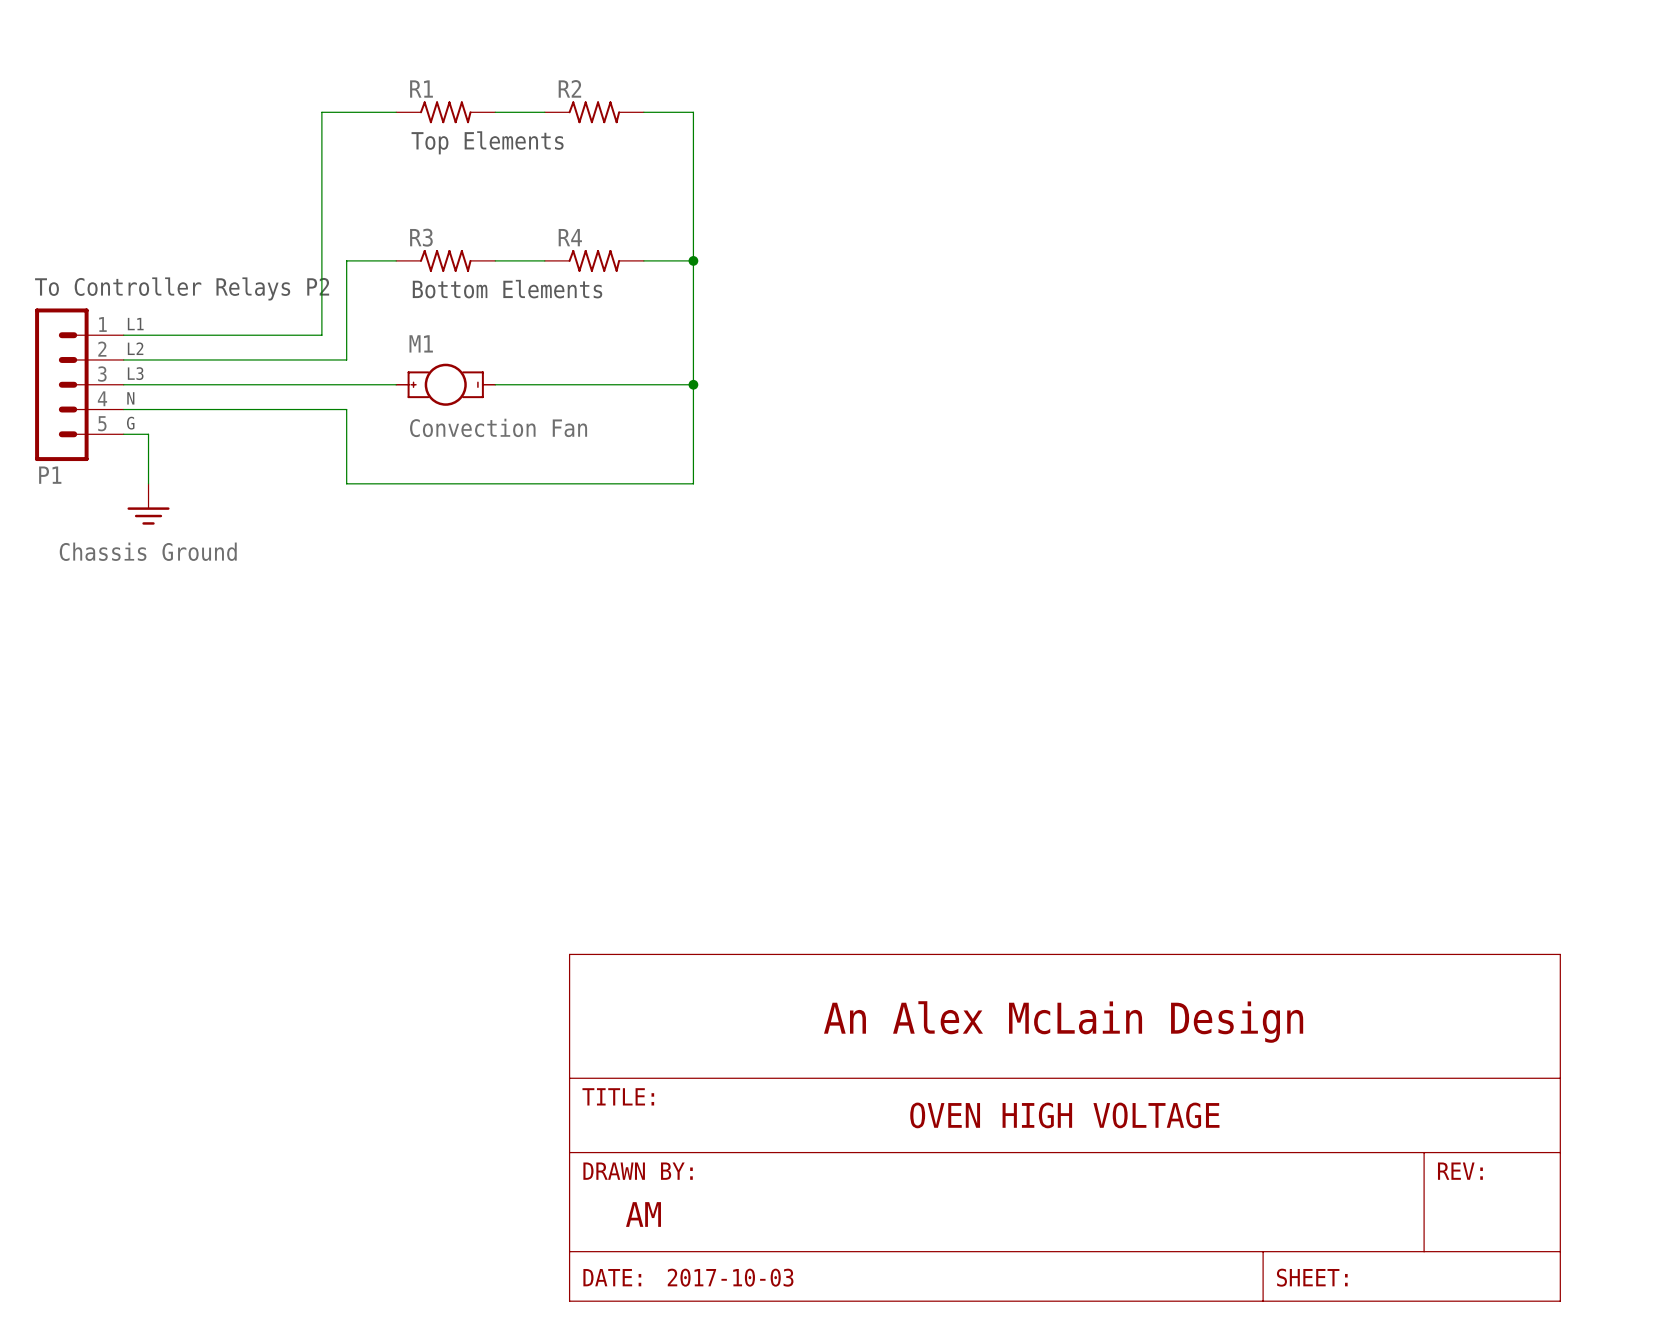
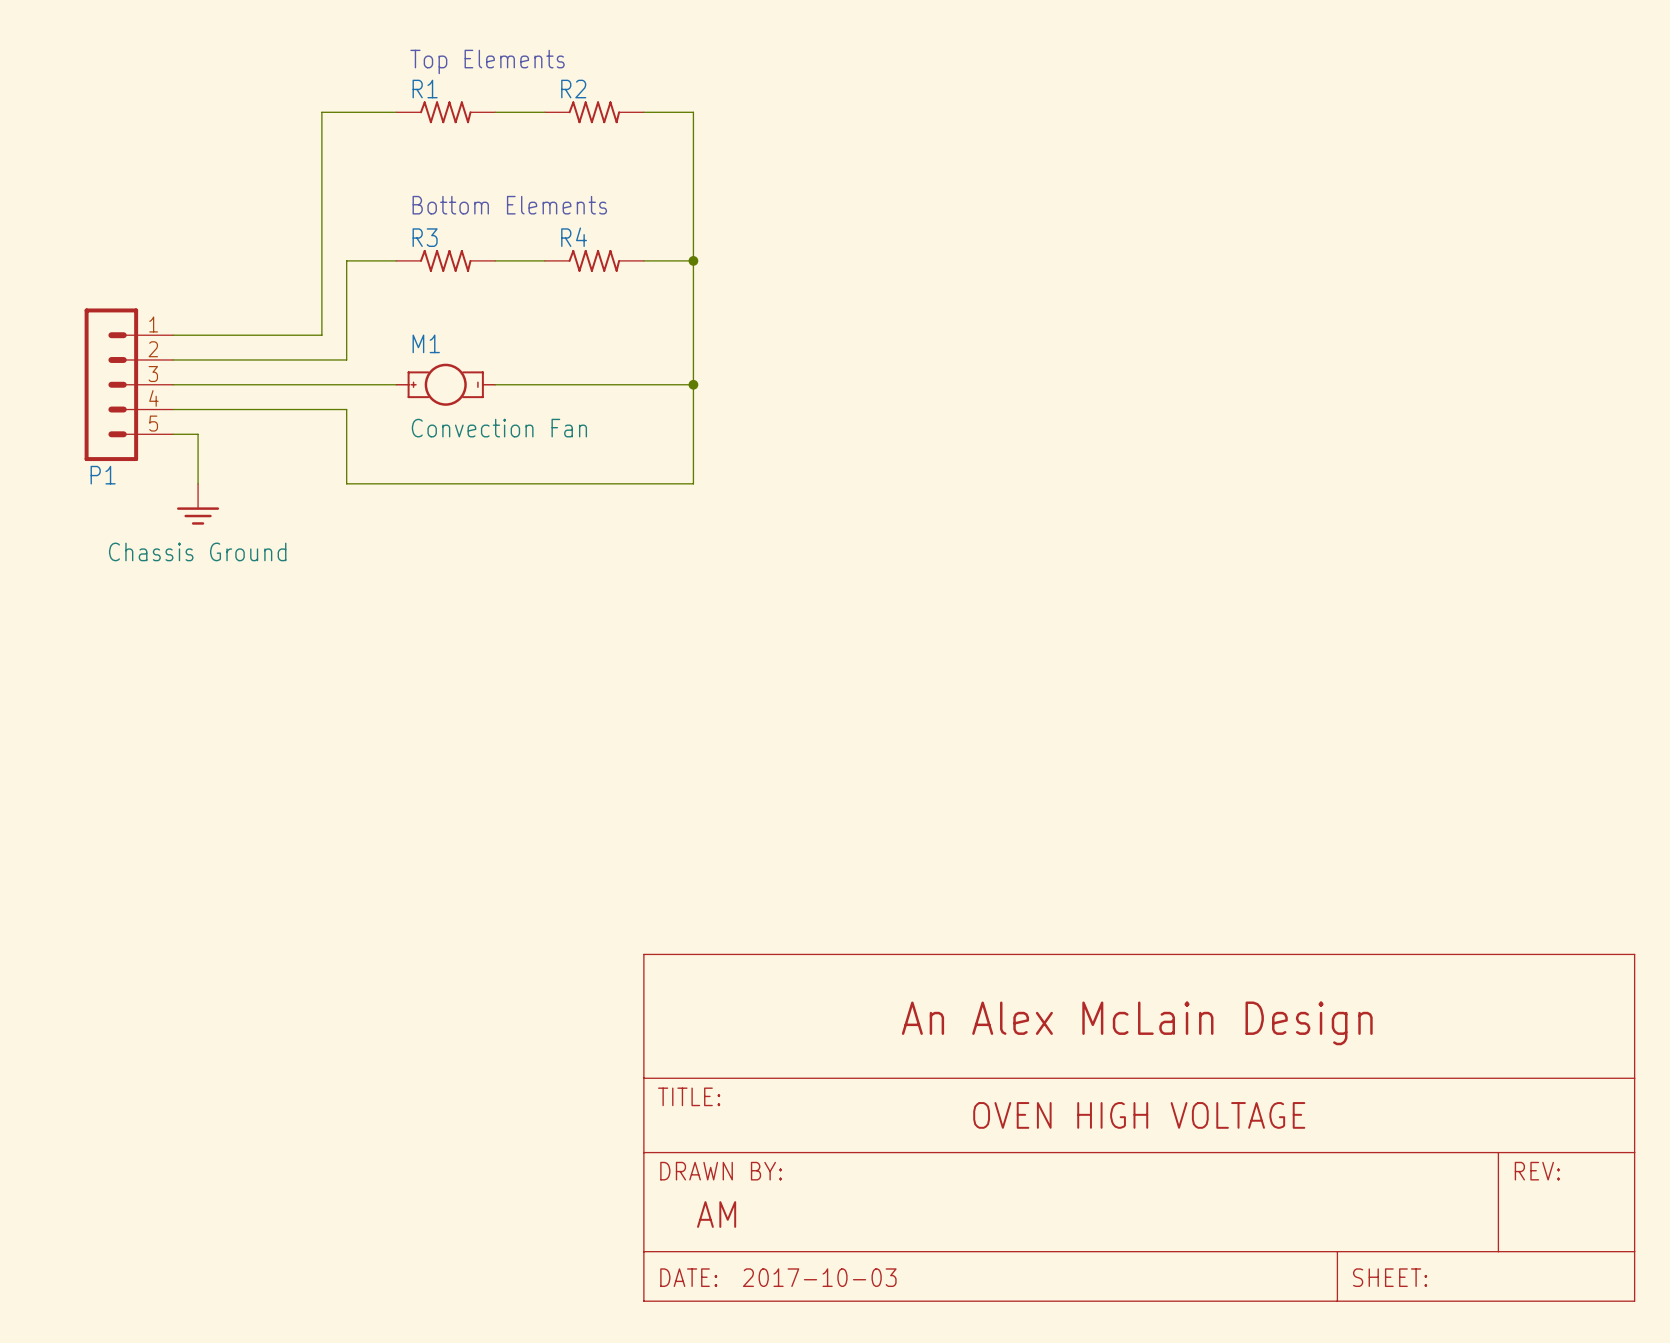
text position: Top Elements (487, 142) -> Top Elements (487, 61)
text: To Controller Relays P2 (182, 288) -> none
text position: Bottom Elements (507, 289) -> Bottom Elements (509, 205)
text: L1 (135, 324) -> none
text: L2 (135, 348) -> none
text: L3 (135, 373) -> none
P1 position: (79, 384) -> (128, 384)
text: N (130, 398) -> none
text: G (130, 423) -> none
wire: (123, 434) (148, 434) (148, 483) -> (173, 434) (198, 434) (198, 483)
power symbol position: Chassis Ground (148, 504) -> Chassis Ground (198, 504)
part position: (1064, 1127) -> (1139, 1127)

